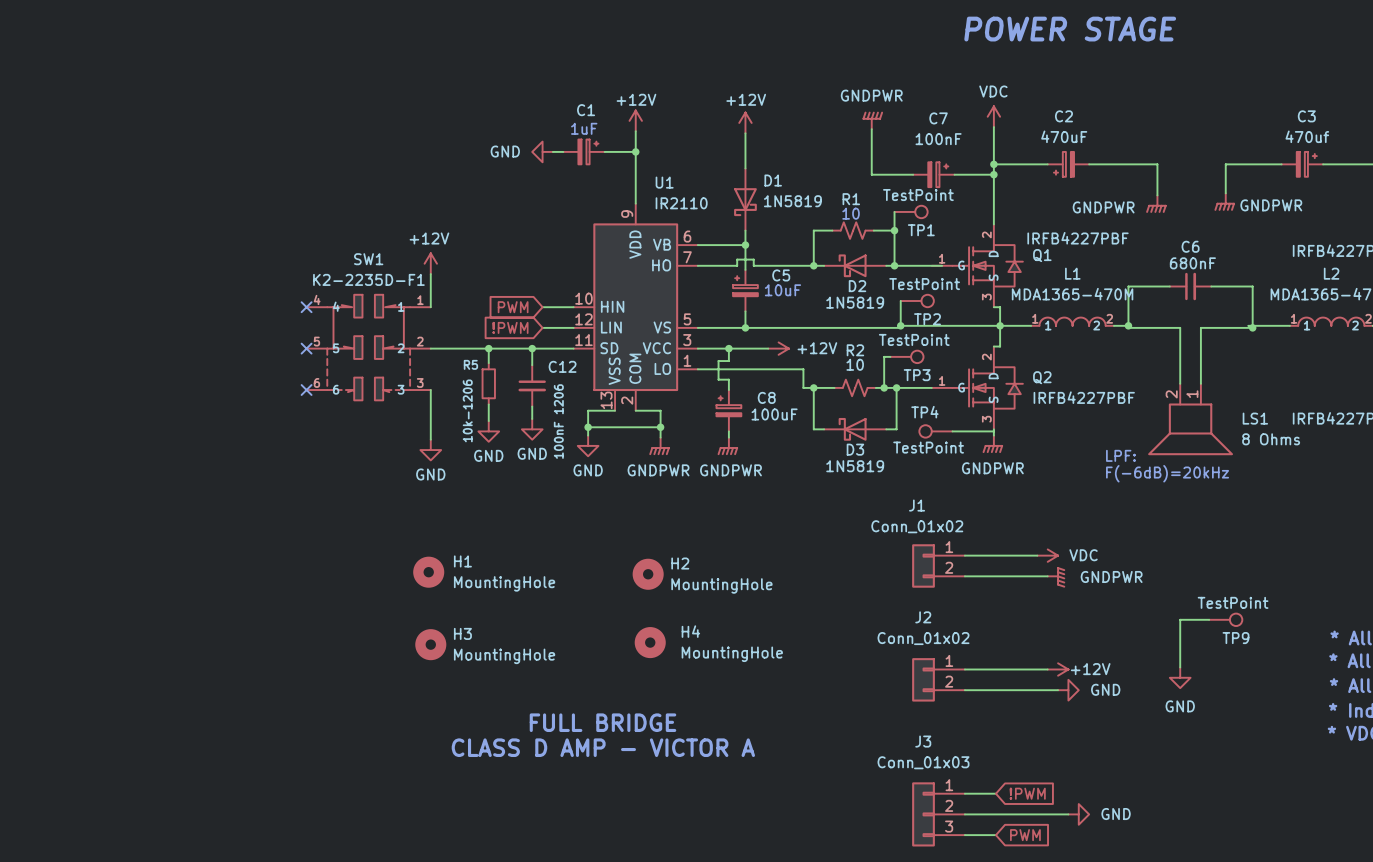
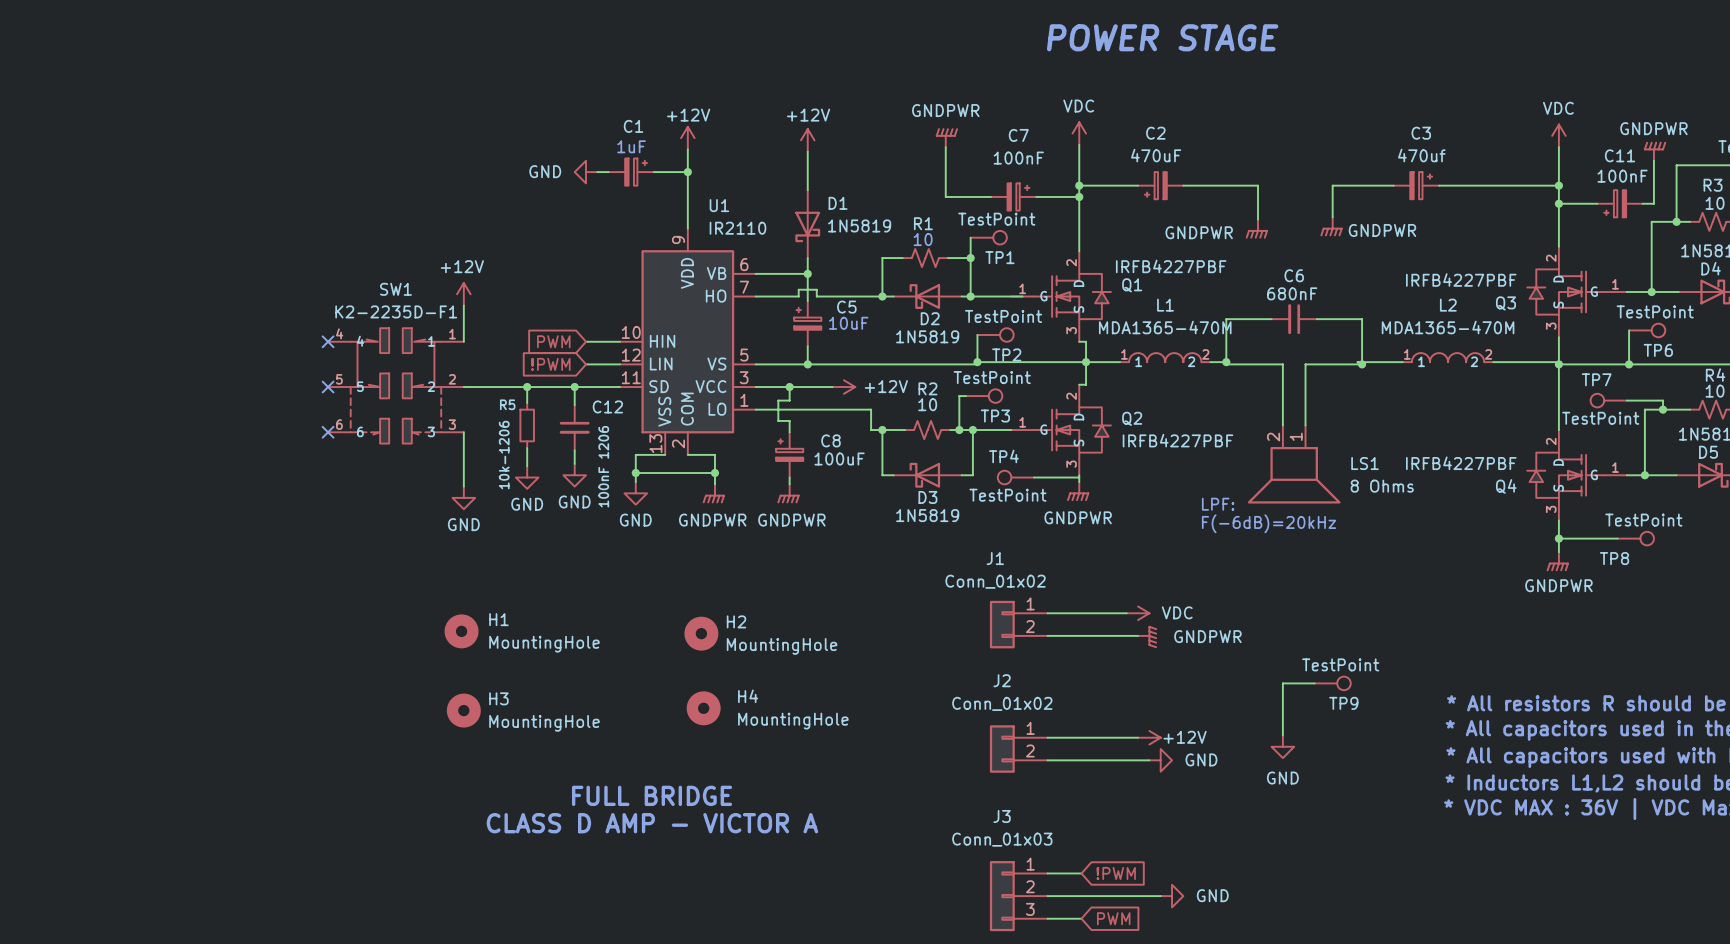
C6 rotation: 0° (1190, 286) -> 180° (1294, 319)

